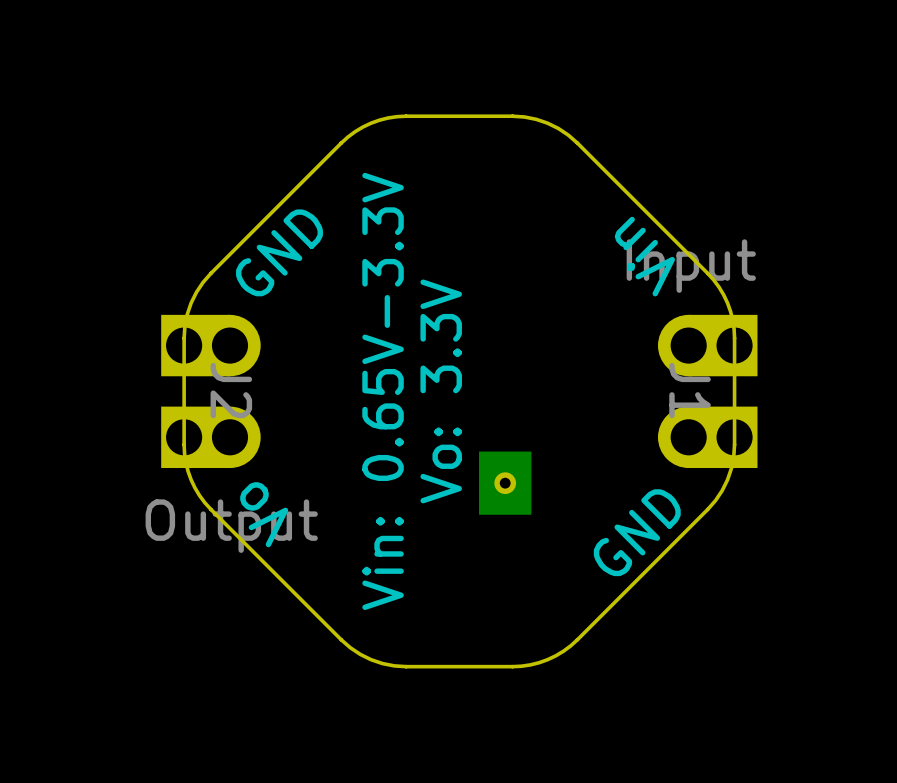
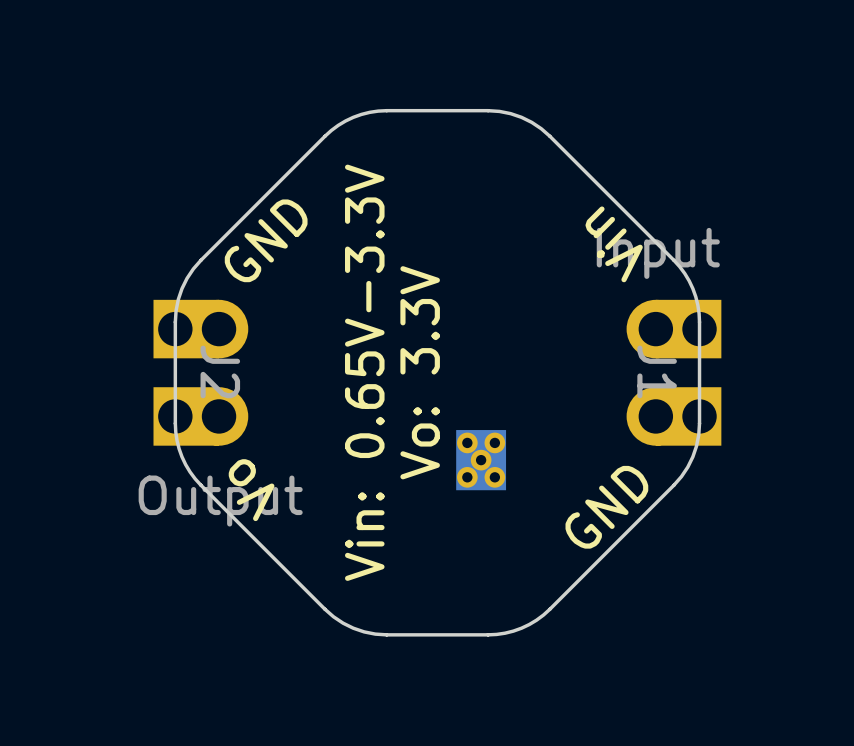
part footprint: [479, 451, 532, 515] -> [456, 430, 507, 491]

